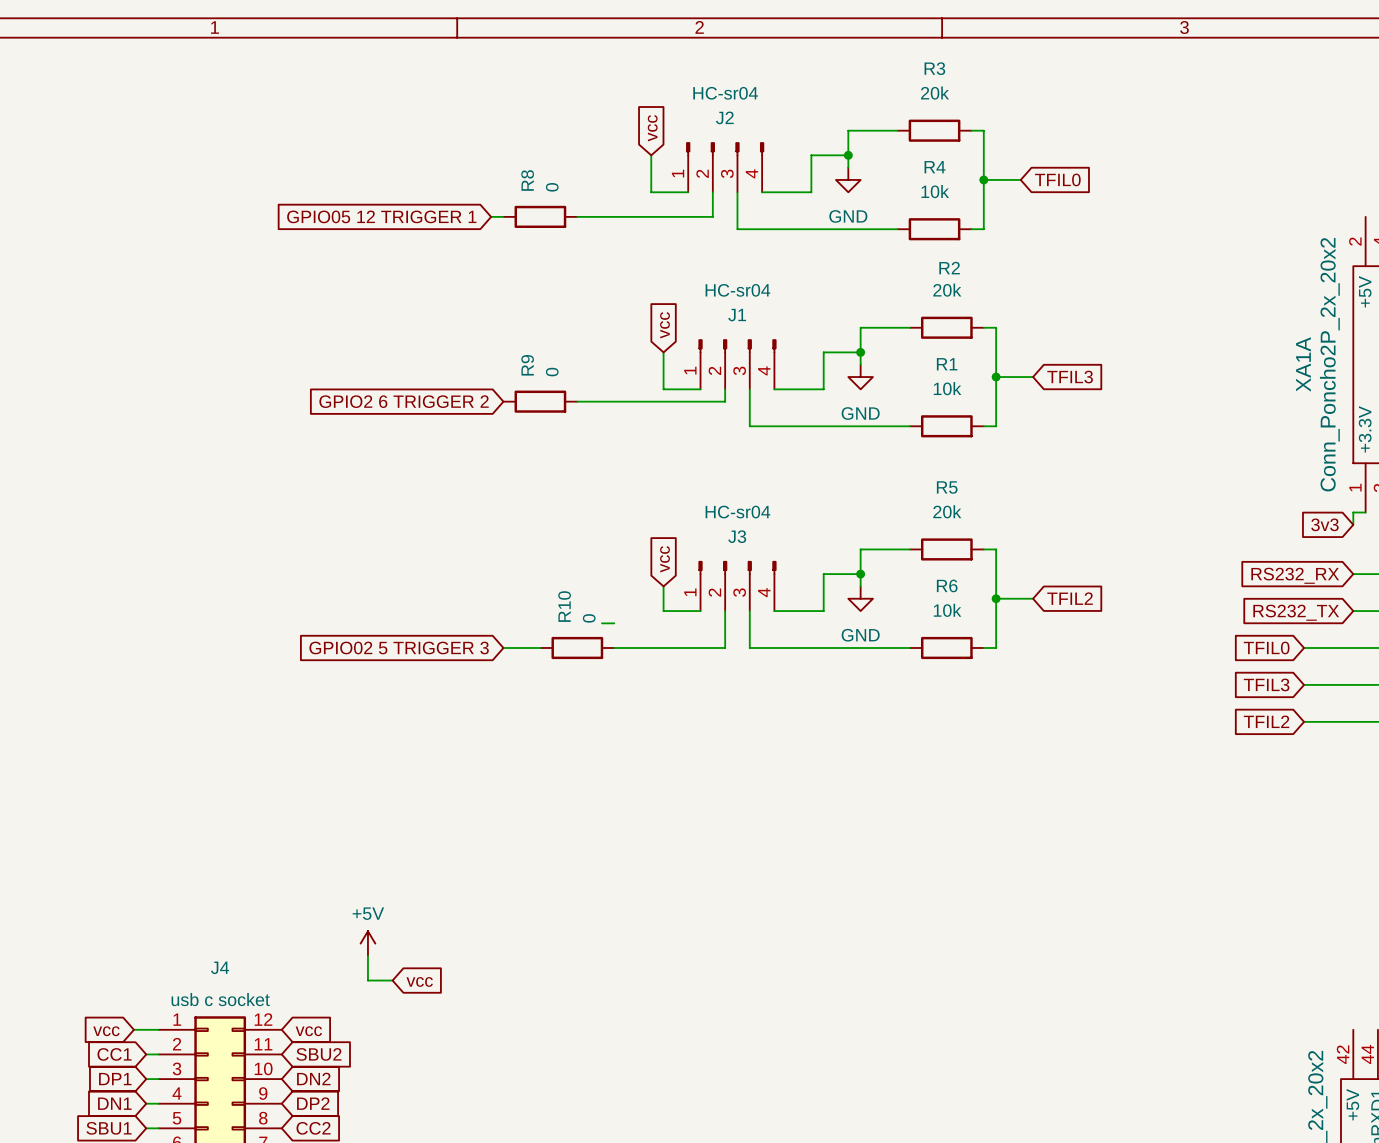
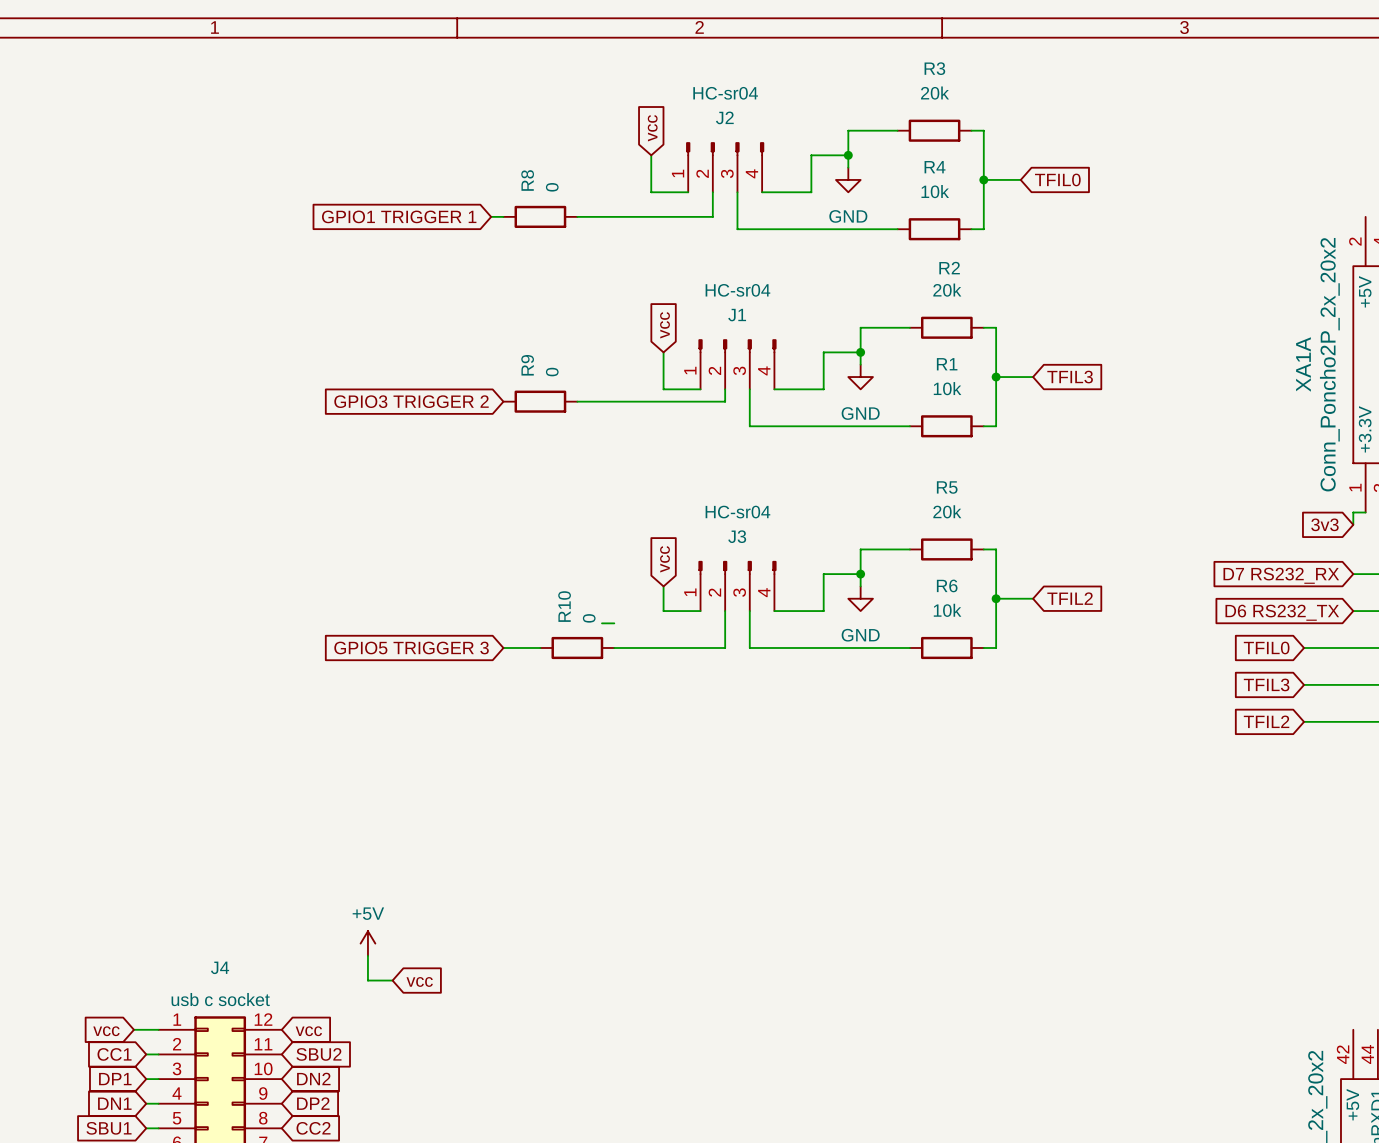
global label: GPIO05 12 TRIGGER 1 (381, 216) -> GPIO1 TRIGGER 1 (399, 216)
global label: GPIO2 6 TRIGGER 2 (404, 401) -> GPIO3 TRIGGER 2 (411, 401)
global label: RS232_RX (1295, 575) -> D7 RS232_RX (1281, 575)
global label: RS232_TX (1296, 612) -> D6 RS232_TX (1282, 612)
global label: GPIO02 5 TRIGGER 3 (399, 647) -> GPIO5 TRIGGER 3 (411, 647)

